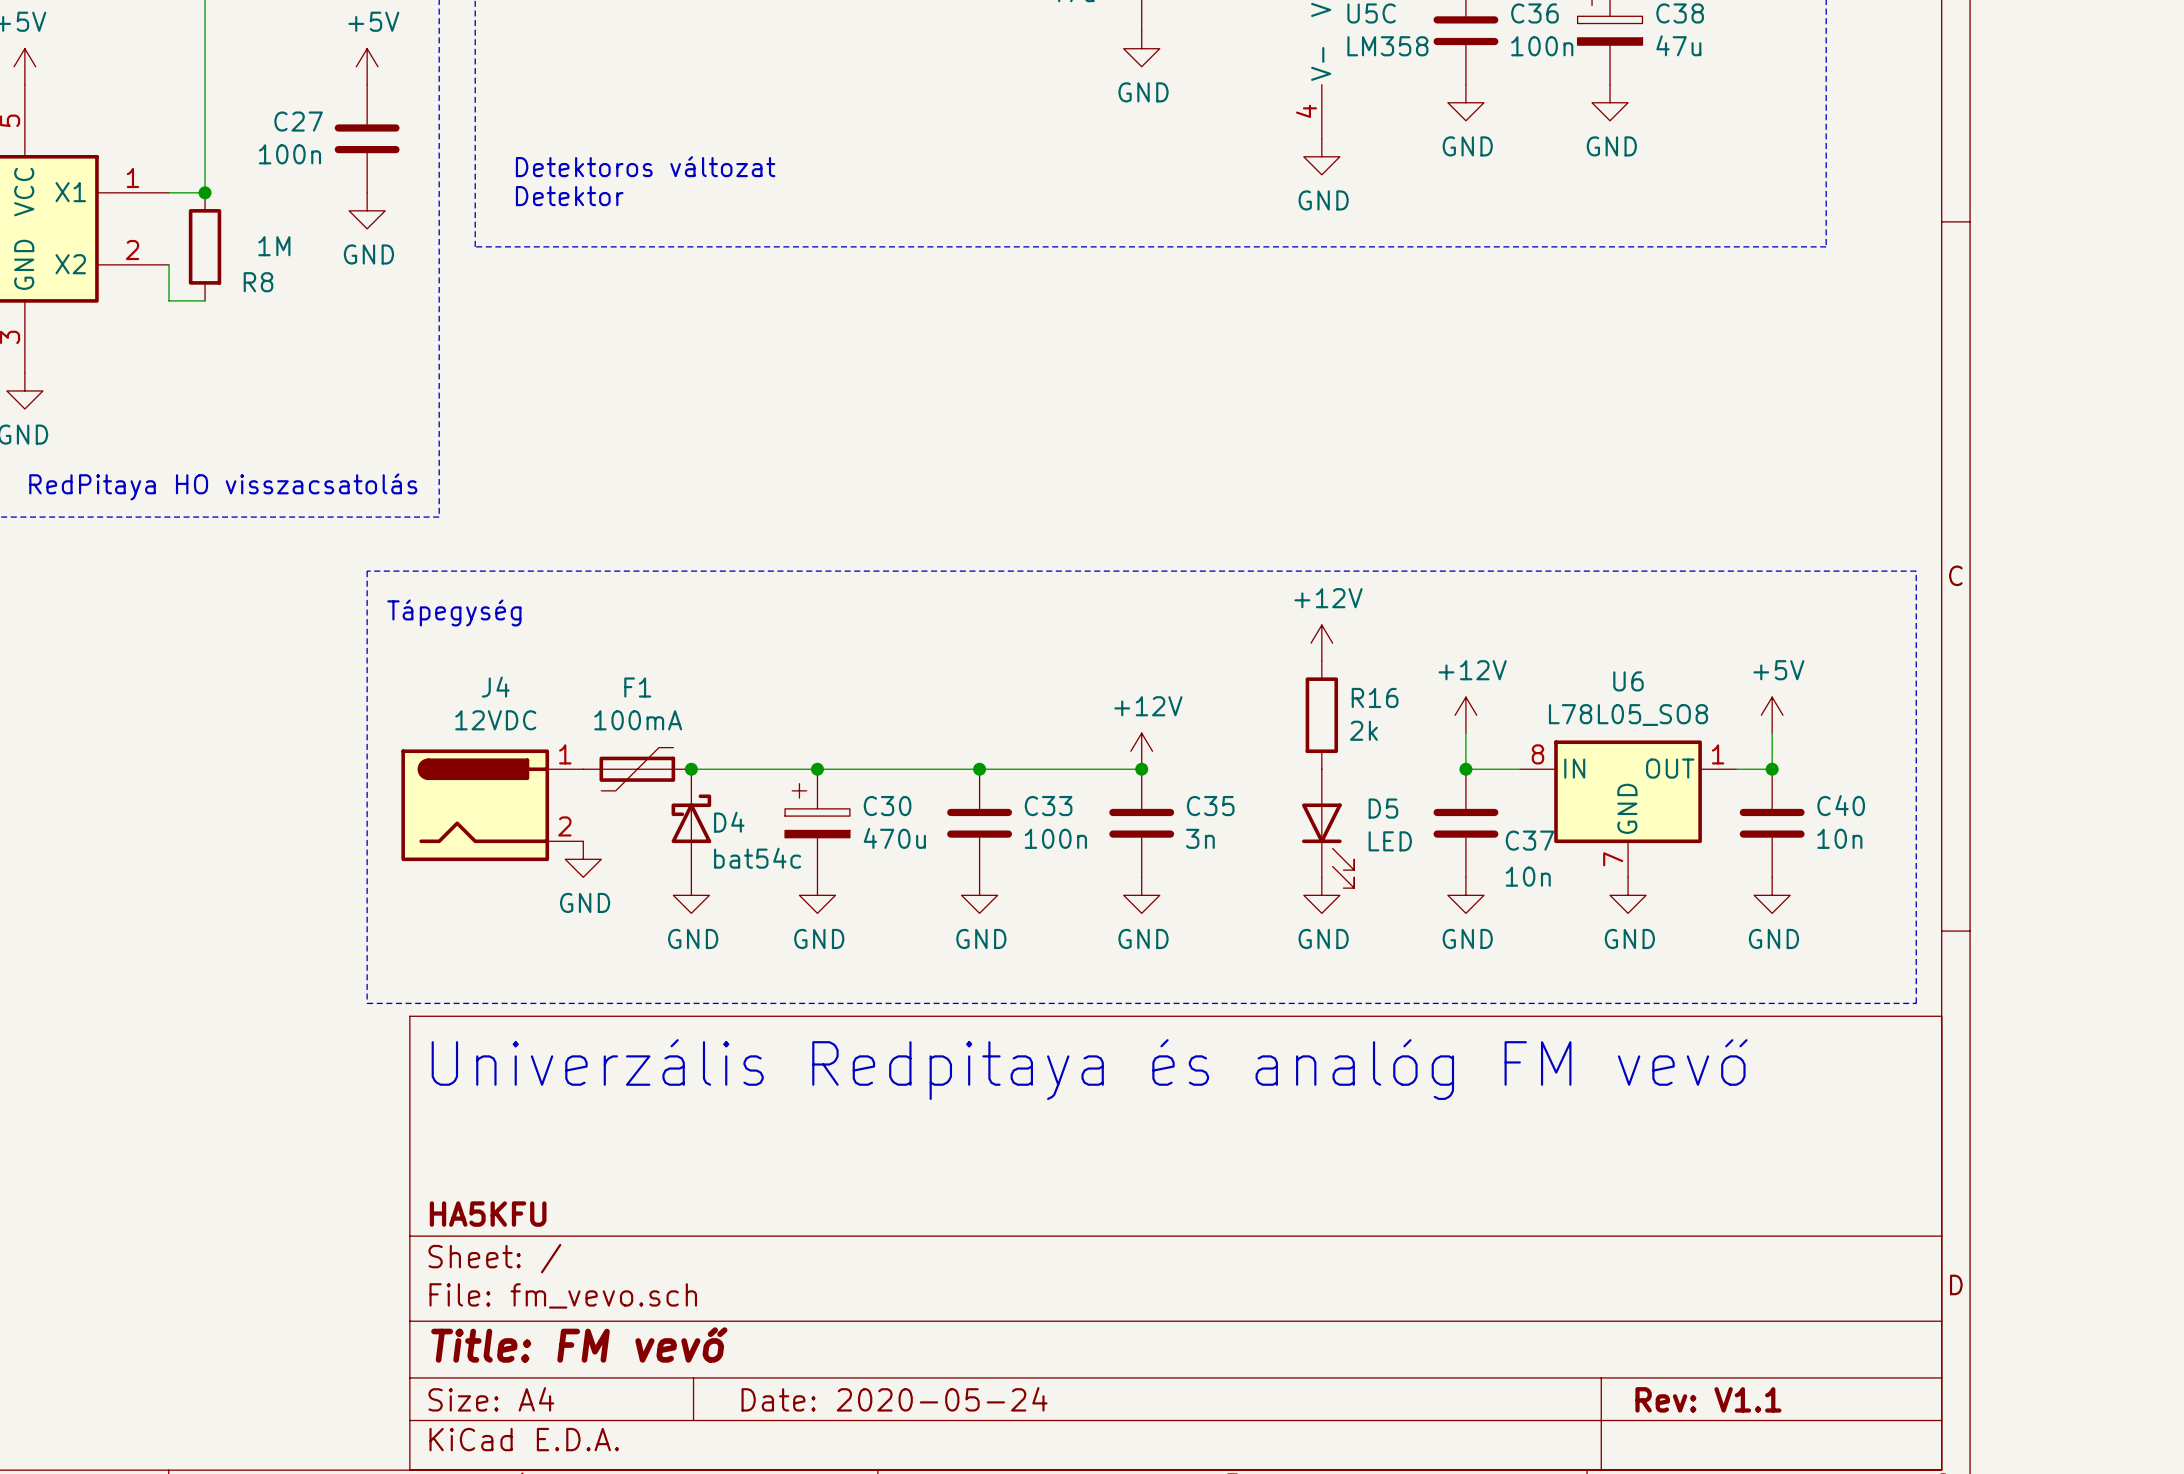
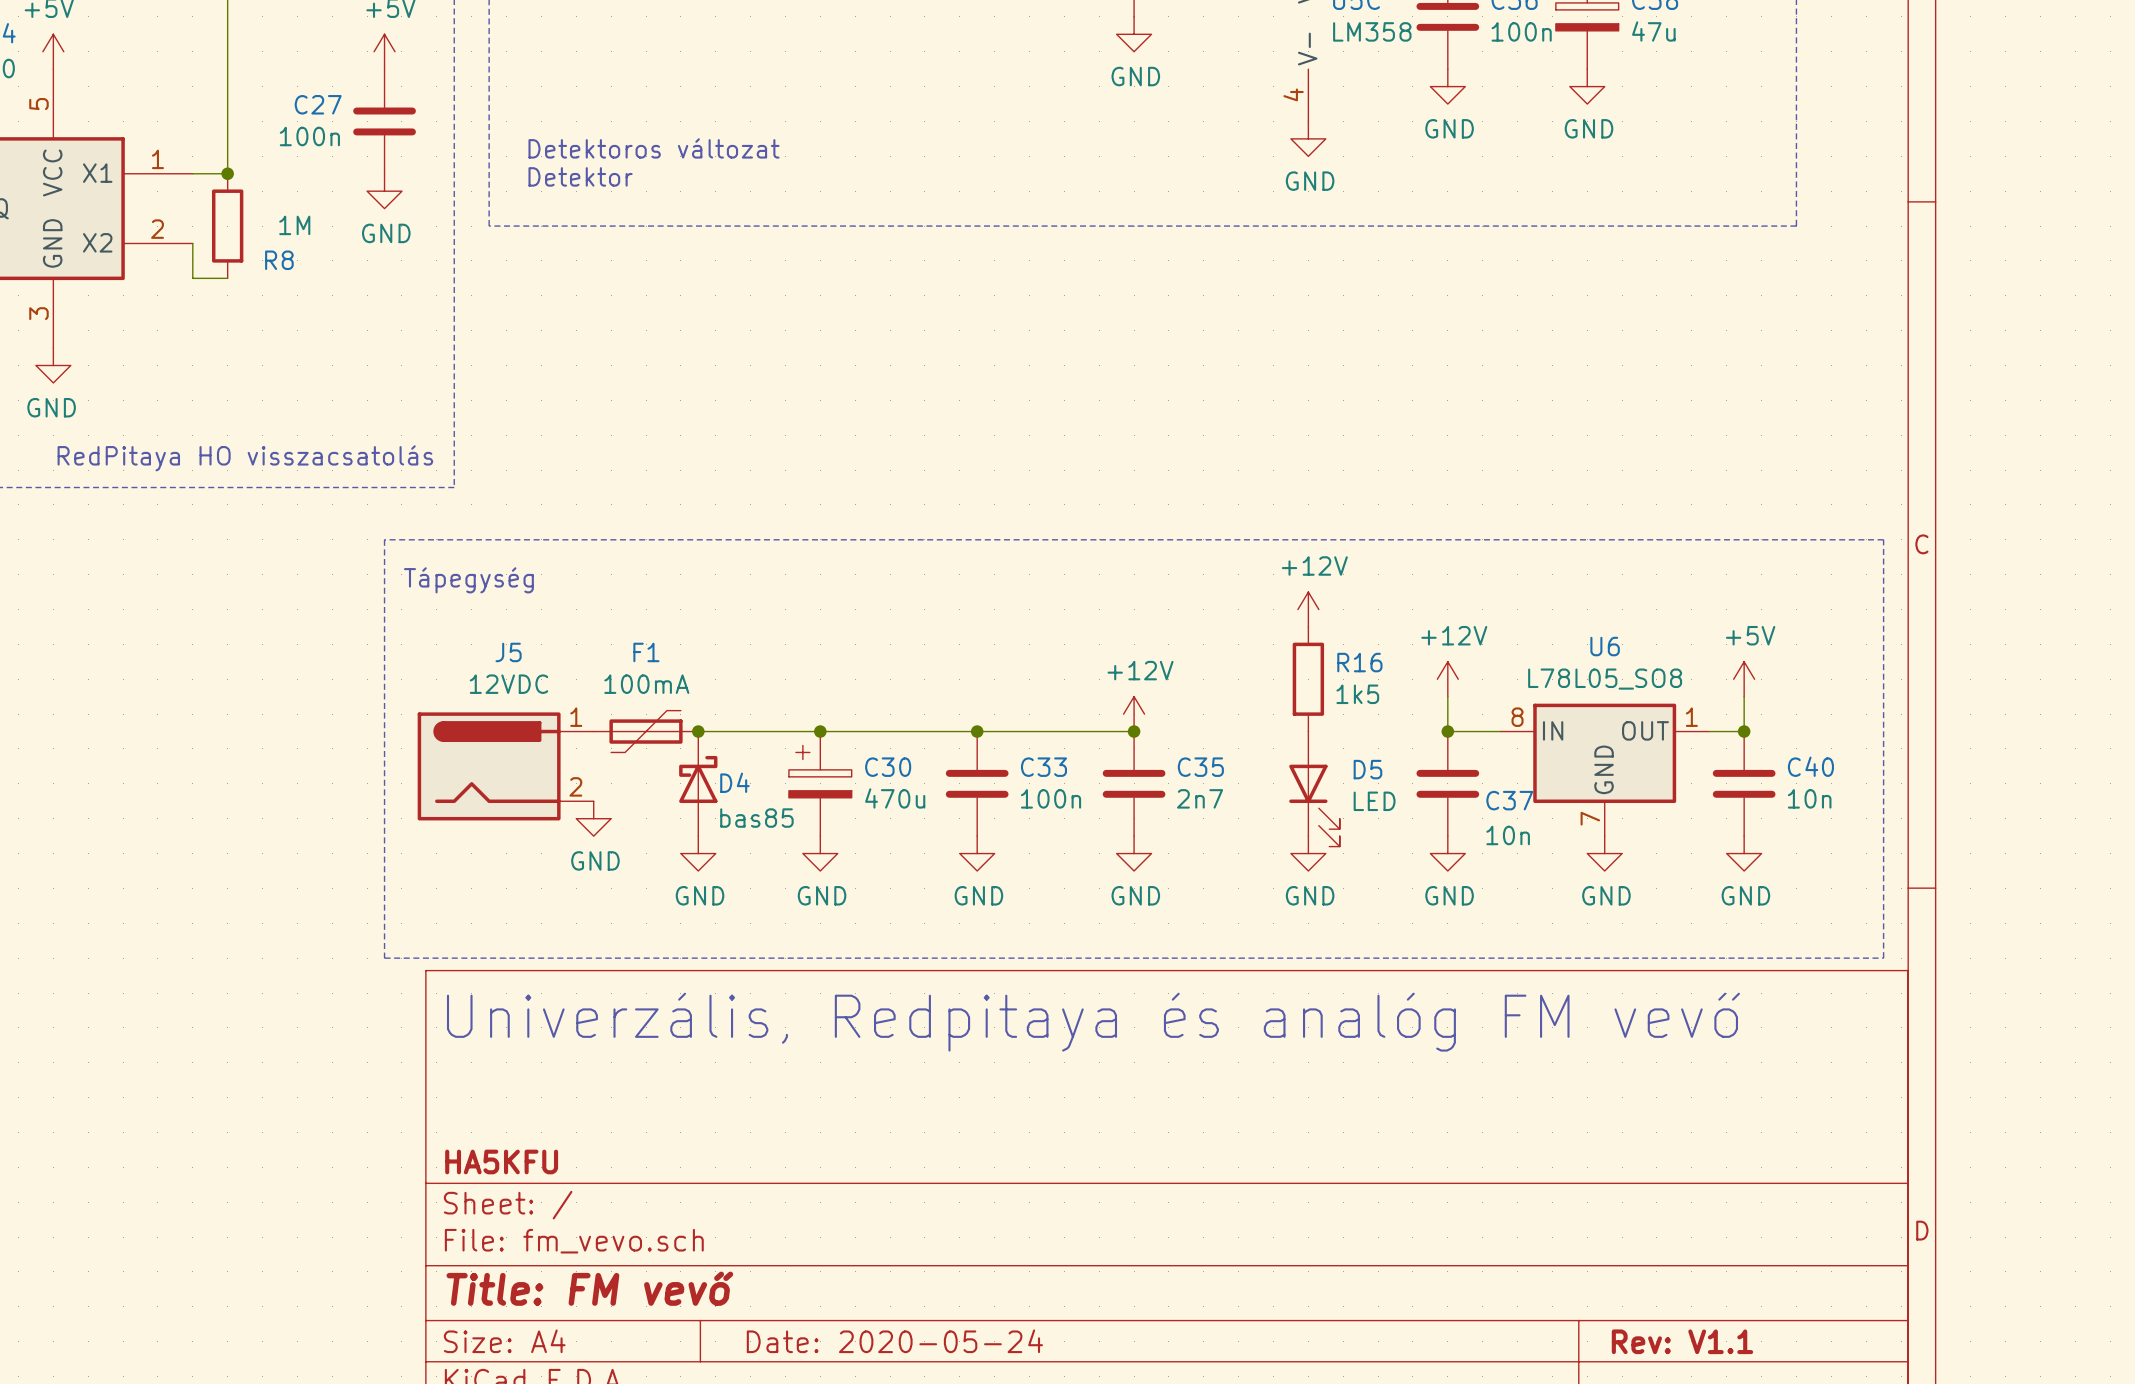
J4 name: J4 (495, 687) -> J5 (508, 652)
R16 value: 2k (1363, 730) -> 1k5 (1357, 694)
C35 value: 3n (1200, 838) -> 2n7 (1200, 798)
D4 value: bat54c (757, 858) -> bas85 (756, 818)
text: Univerzális Redpitaya és analóg FM vevő (1089, 1069) -> Univerzális, Redpitaya és analóg FM vevő (1093, 1022)

